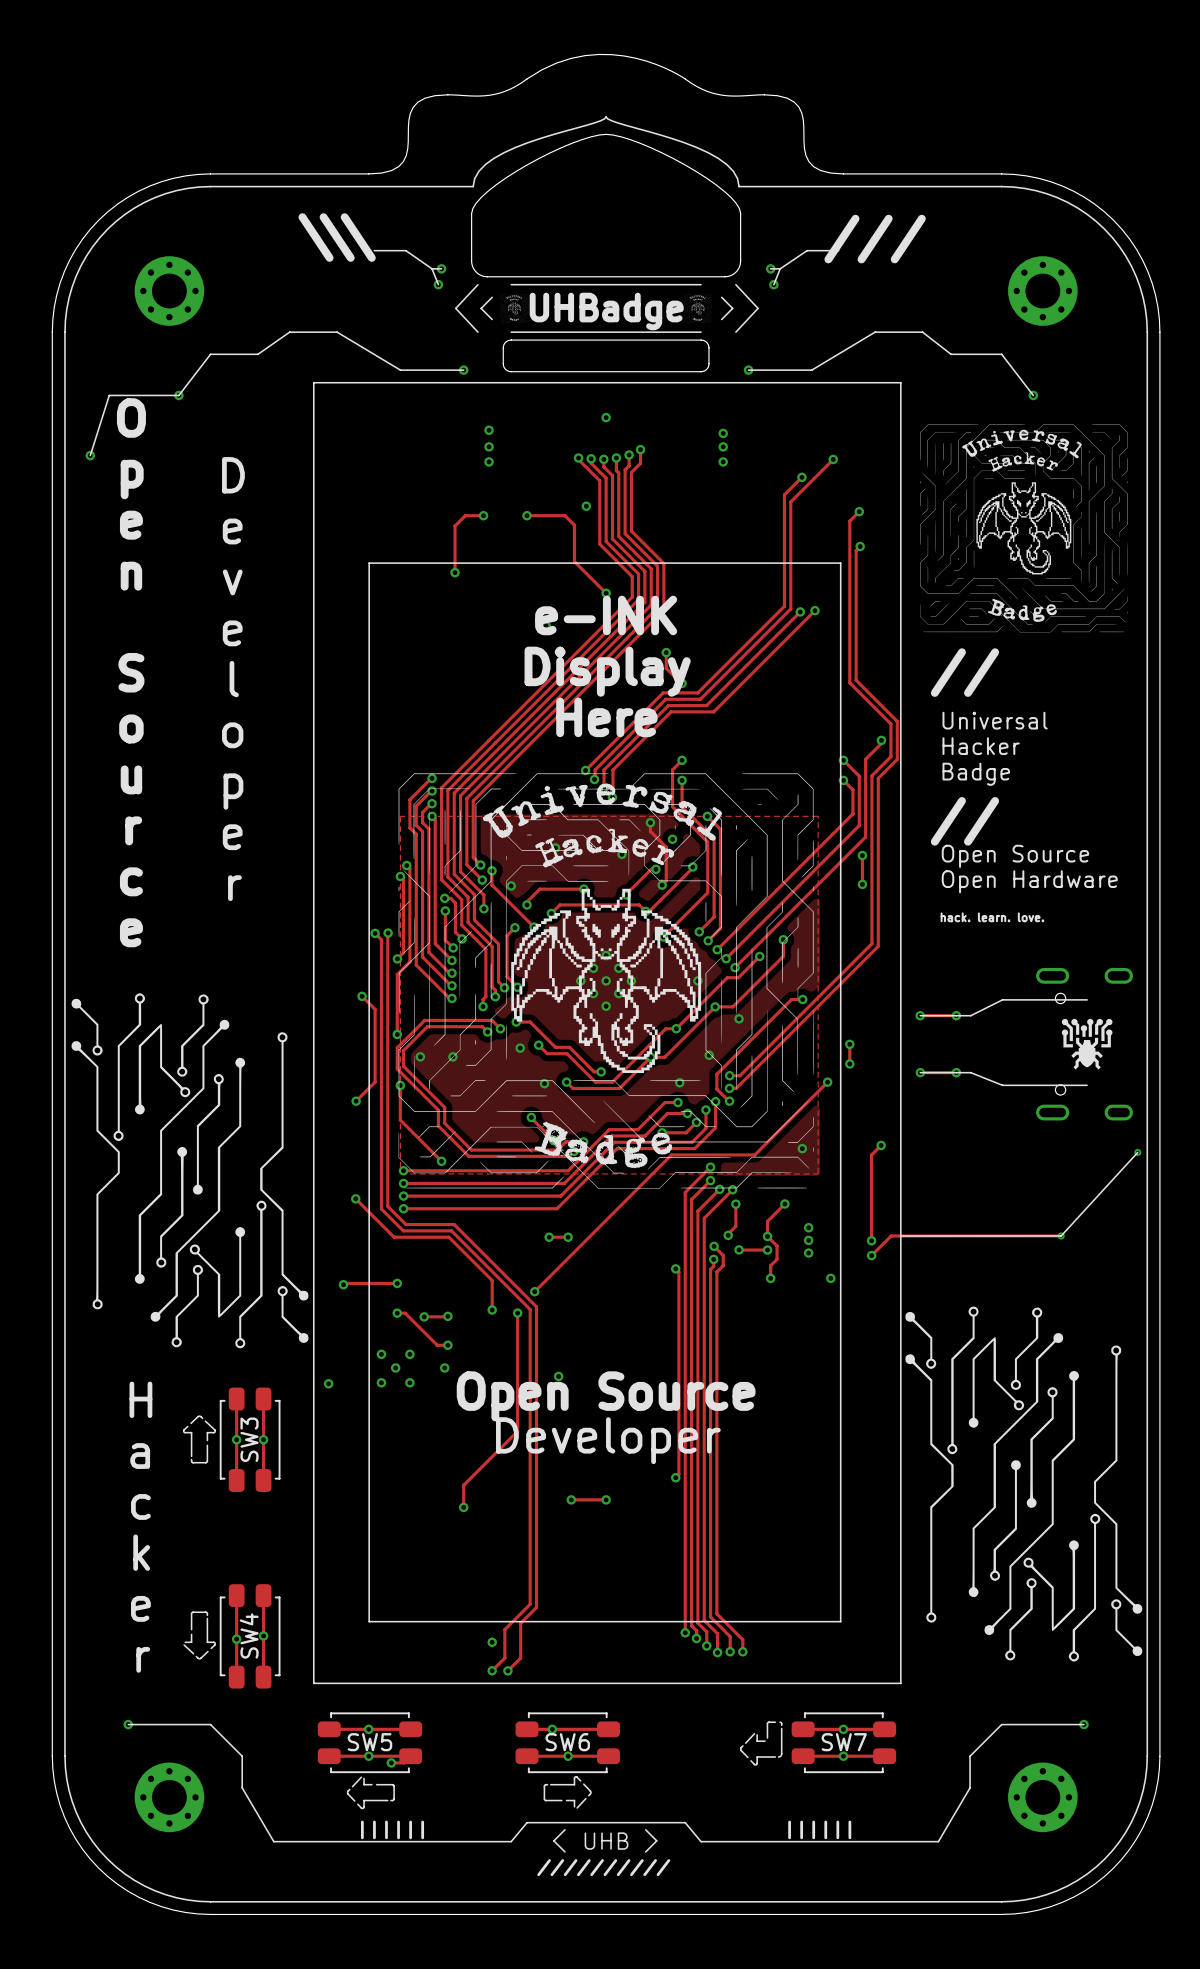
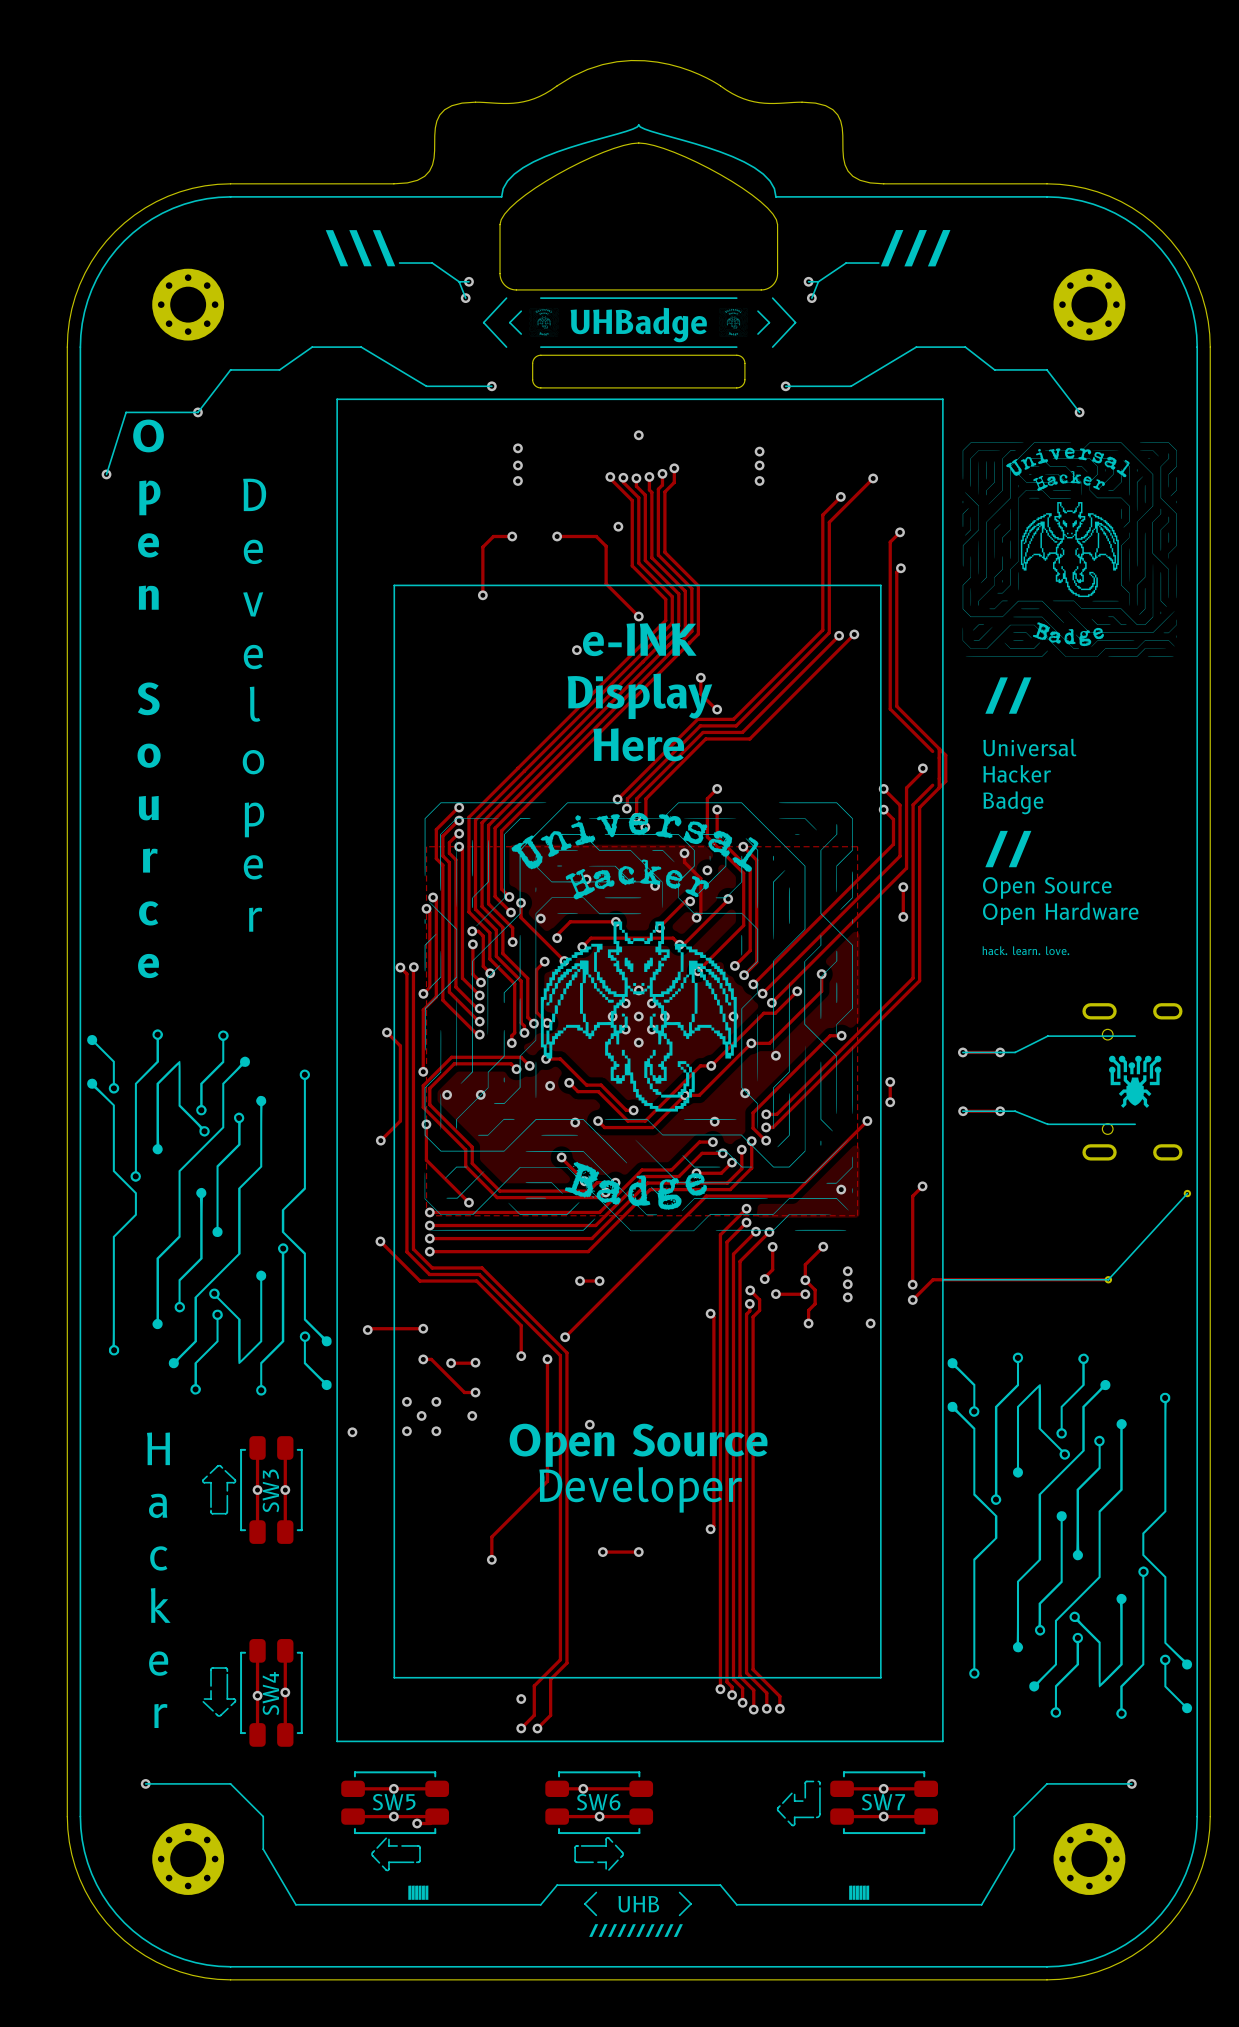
track: none -> (939, 748) (945, 755) (945, 781) (939, 787)
track: (890, 724) (890, 756) -> none

